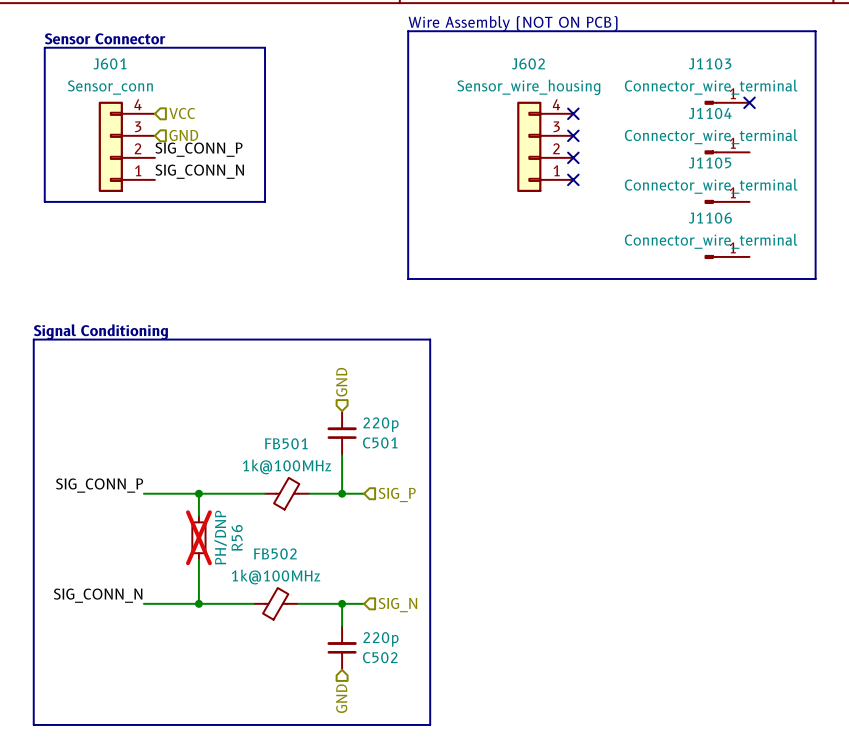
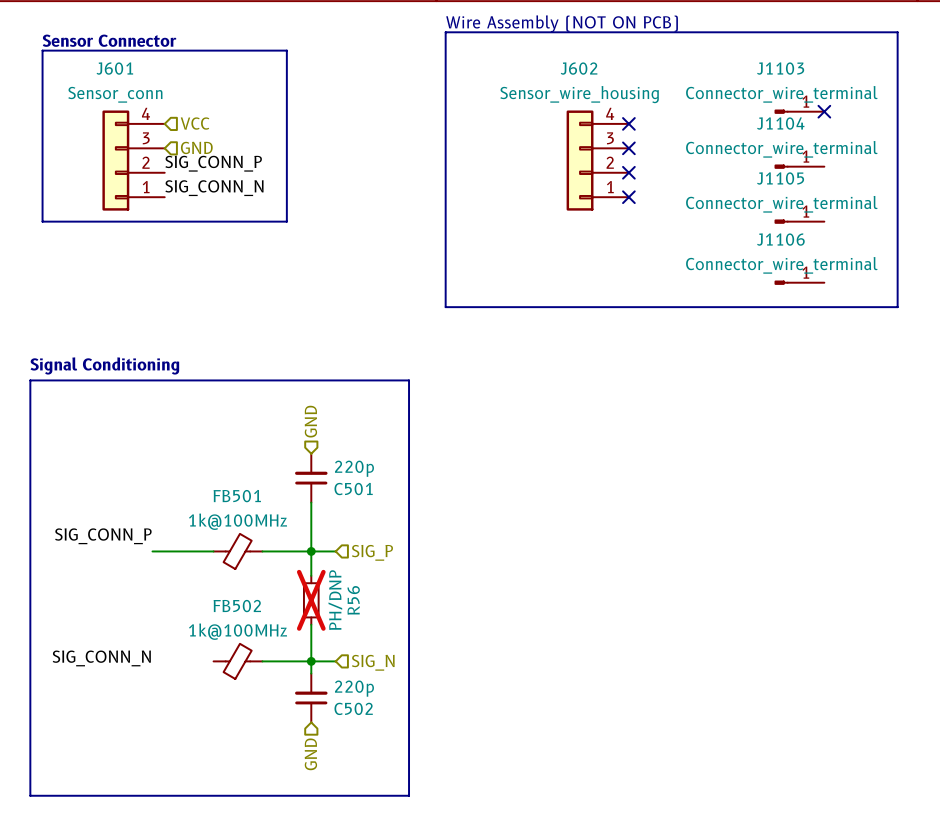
line: (33, 345) (33, 339) (430, 339) (430, 724) (33, 724) (33, 719) -> (30, 380) (409, 380) (409, 795) (30, 795)
hierarchical label position: GND (341, 382) -> GND (310, 421)
C501 position: (342, 433) -> (311, 478)
wire: none -> (311, 502) (311, 575)
wire: (342, 455) (342, 493) -> none
wire: (143, 493) (265, 493) -> none
wire: (198, 493) (198, 515) -> none
junction: (198, 493) -> none
FB501 position: (287, 493) -> (238, 551)
wire: (309, 493) (364, 493) -> (152, 551) (213, 551)
junction: (342, 493) -> none
hierarchical label position: SIG_P (397, 494) -> SIG_P (372, 552)
wire: none -> (262, 551) (335, 551)
junction: none -> (311, 551)
R56 position: (198, 537) -> (311, 600)
wire: (198, 559) (198, 603) -> (311, 624) (311, 673)
junction: none -> (311, 661)
wire: (143, 603) (253, 603) -> none
junction: (198, 603) -> none
FB502 position: (276, 603) -> (238, 661)
wire: (298, 603) (364, 603) -> (262, 661) (335, 661)
wire: (342, 603) (342, 625) -> none
junction: (342, 603) -> none
hierarchical label position: SIG_N (397, 605) -> SIG_N (373, 662)
C502 position: (342, 647) -> (311, 698)
hierarchical label position: GND (341, 698) -> GND (310, 754)

